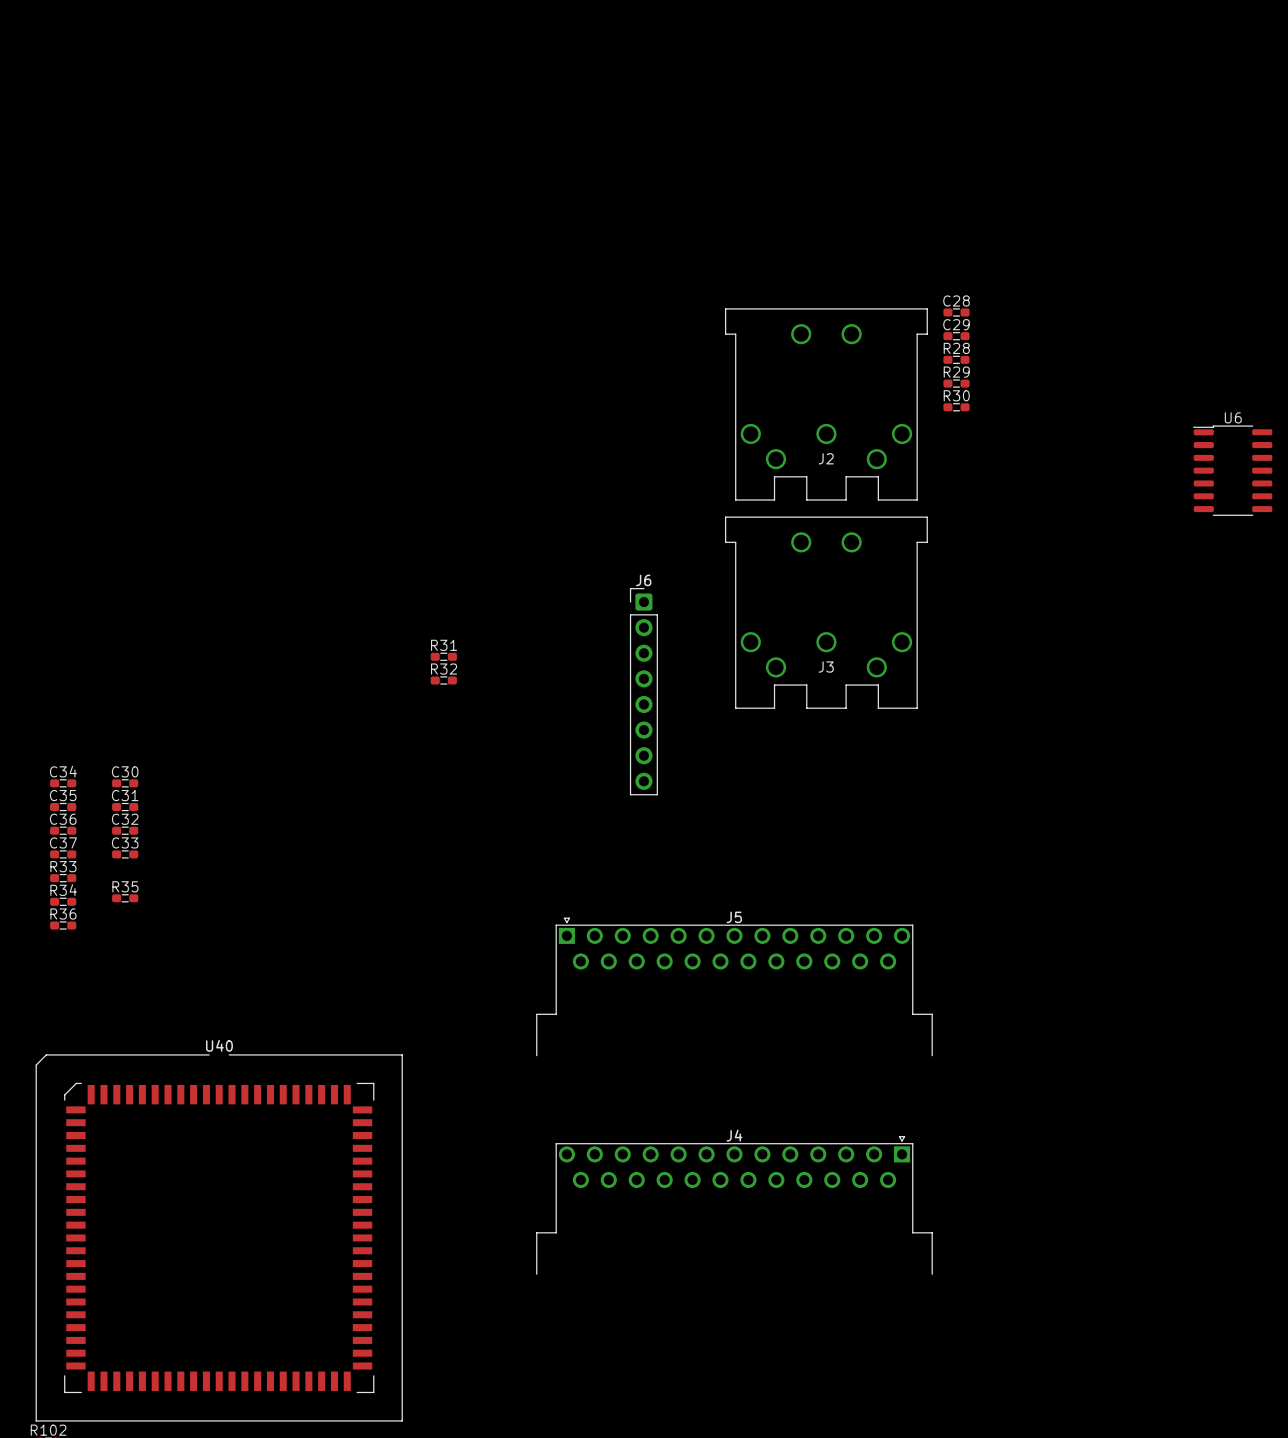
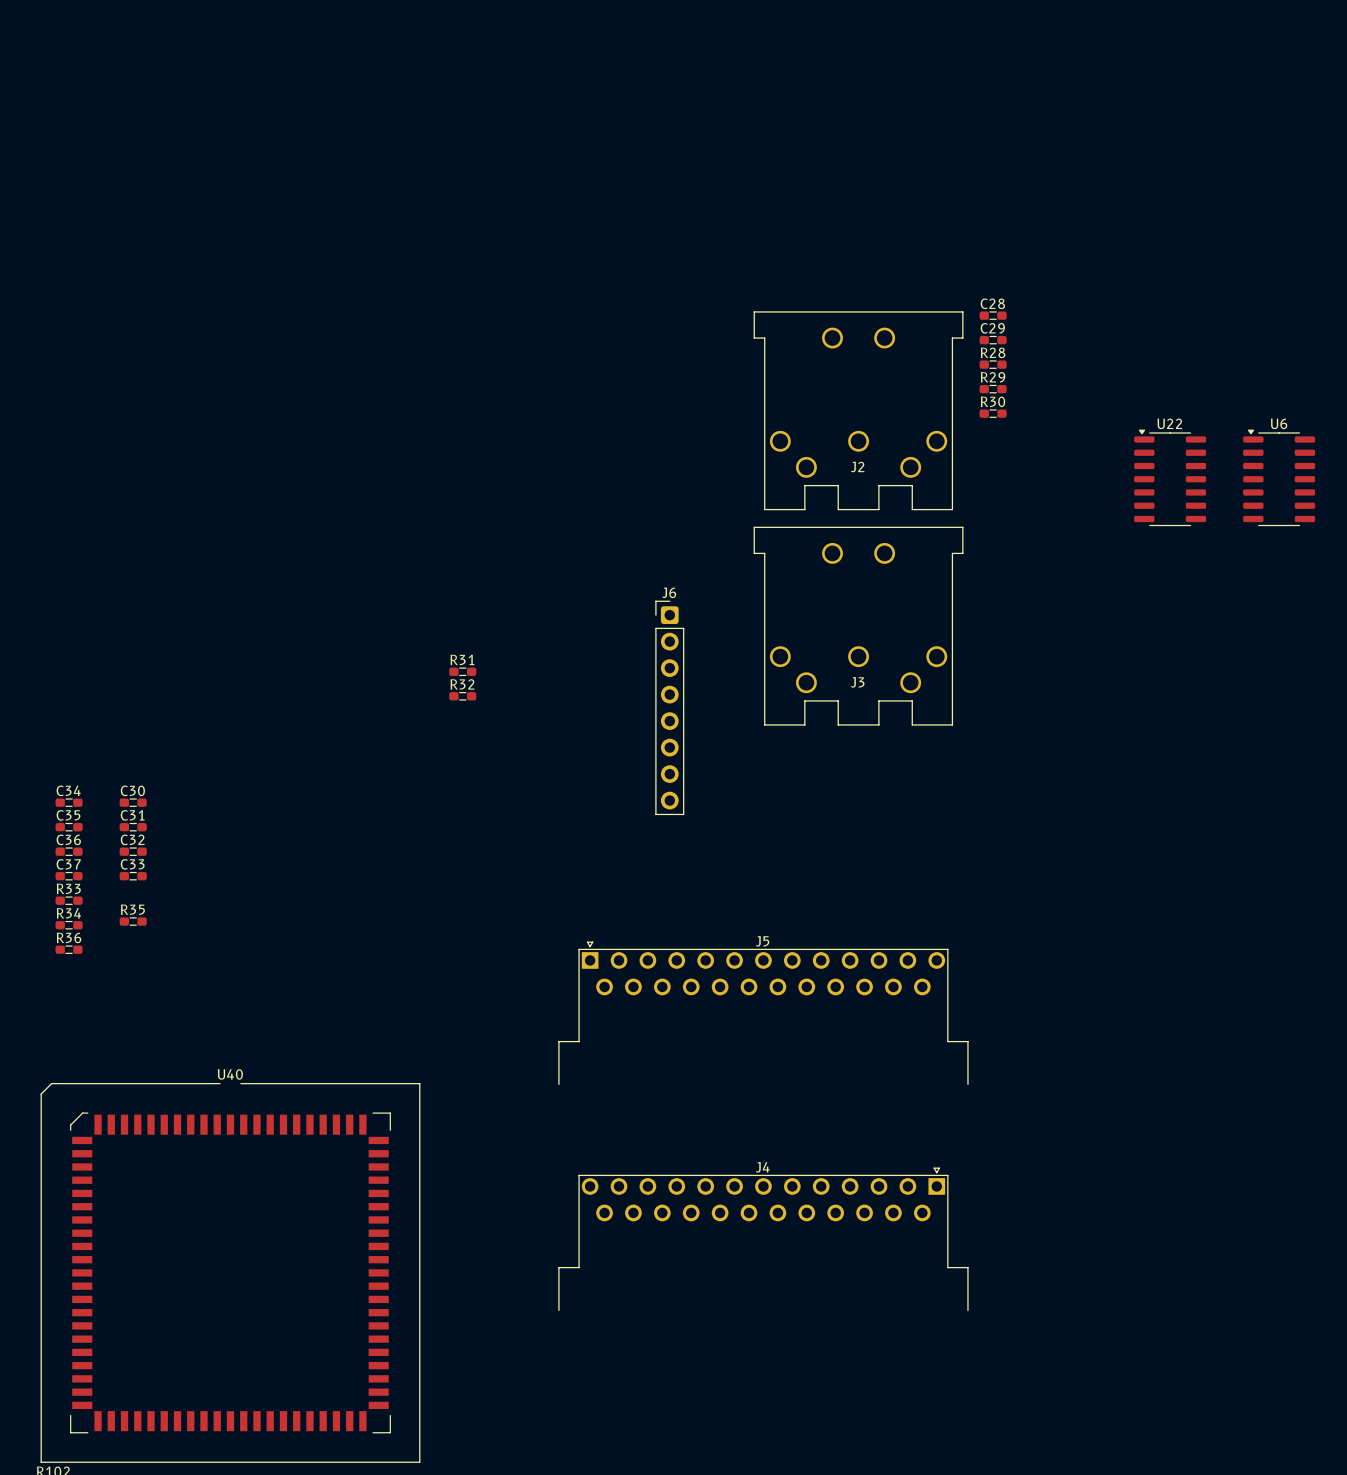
U6 footprint: [1193, 425, 1273, 516] -> [1243, 429, 1316, 527]
U22: none -> (1170, 477)

